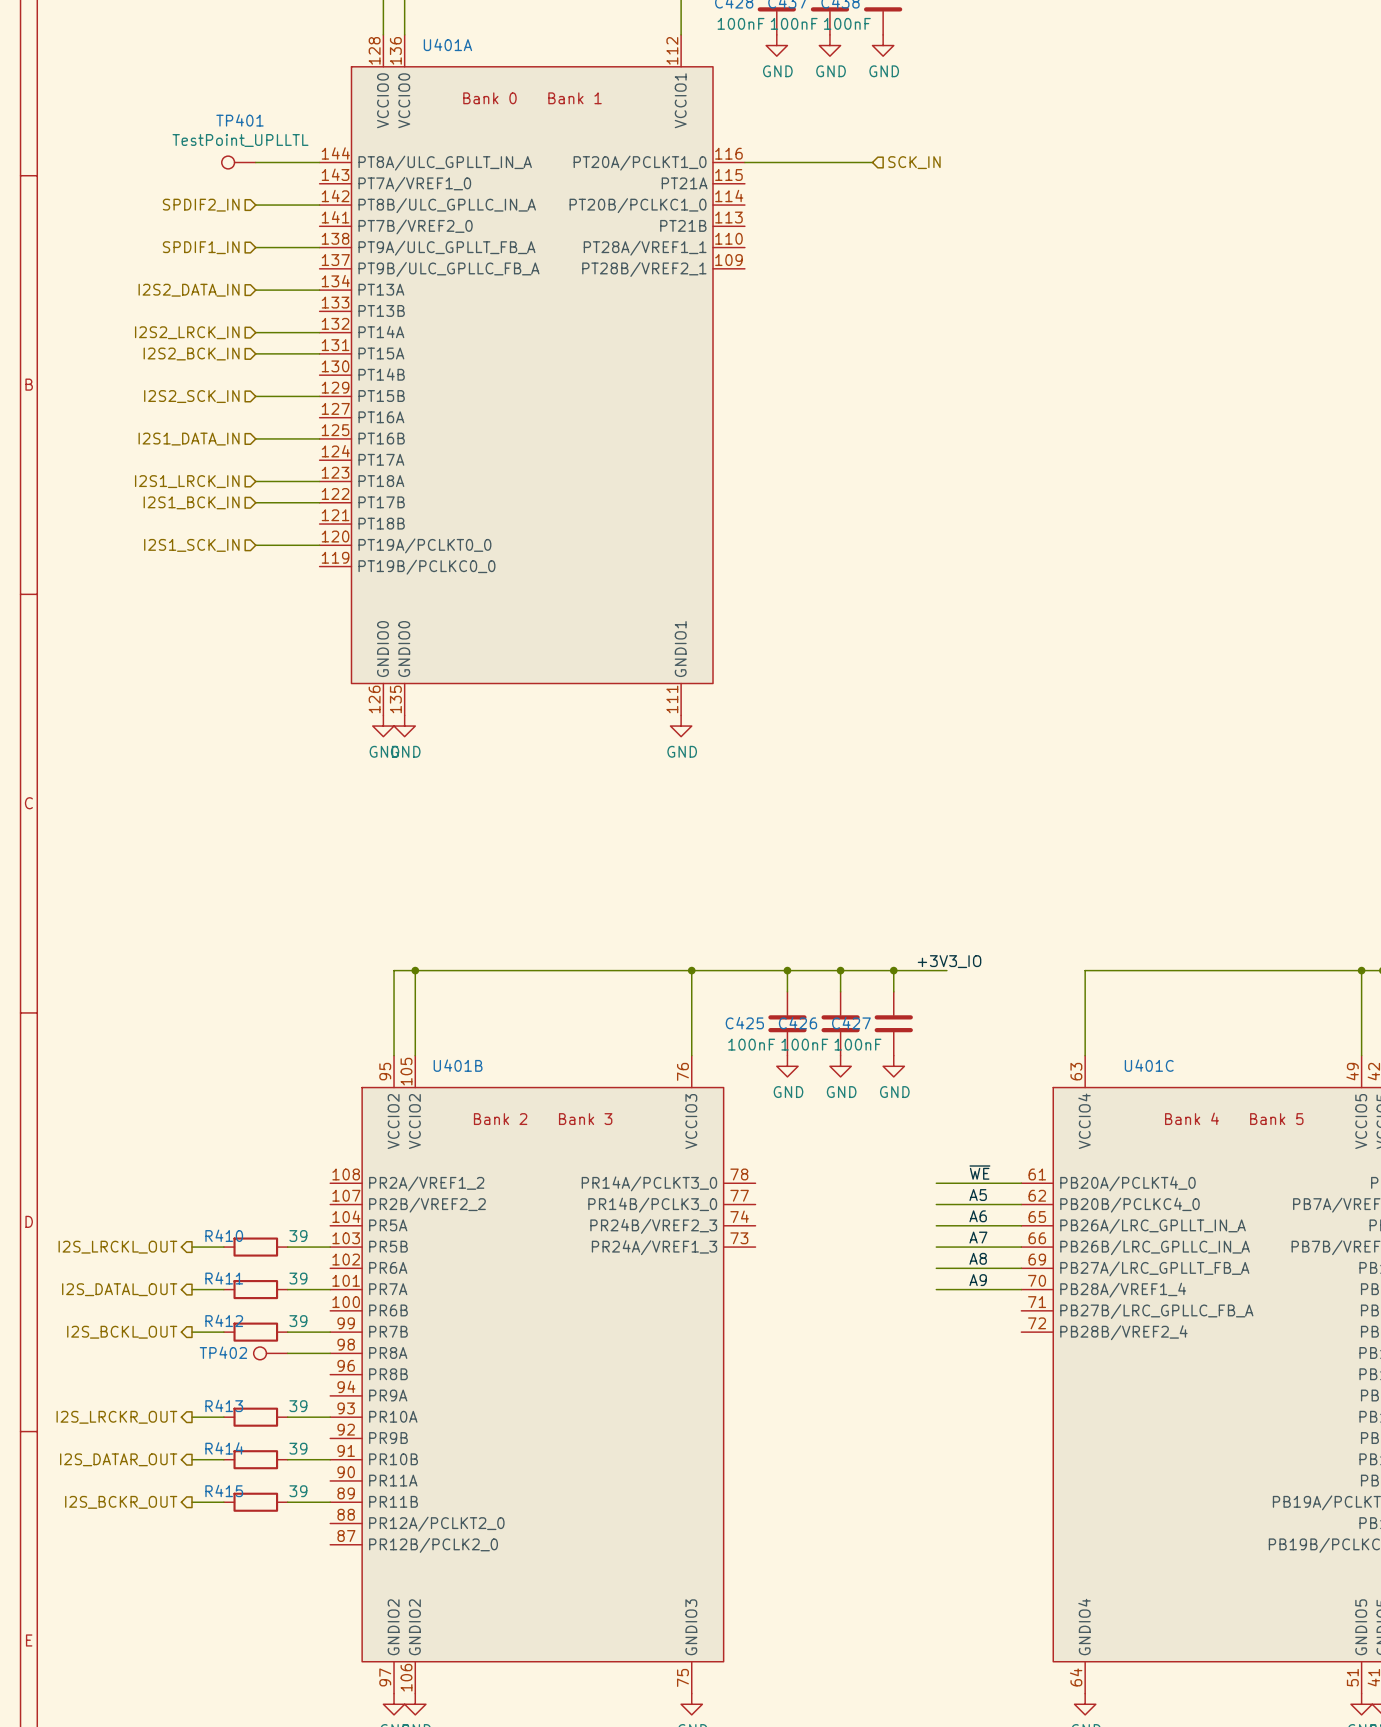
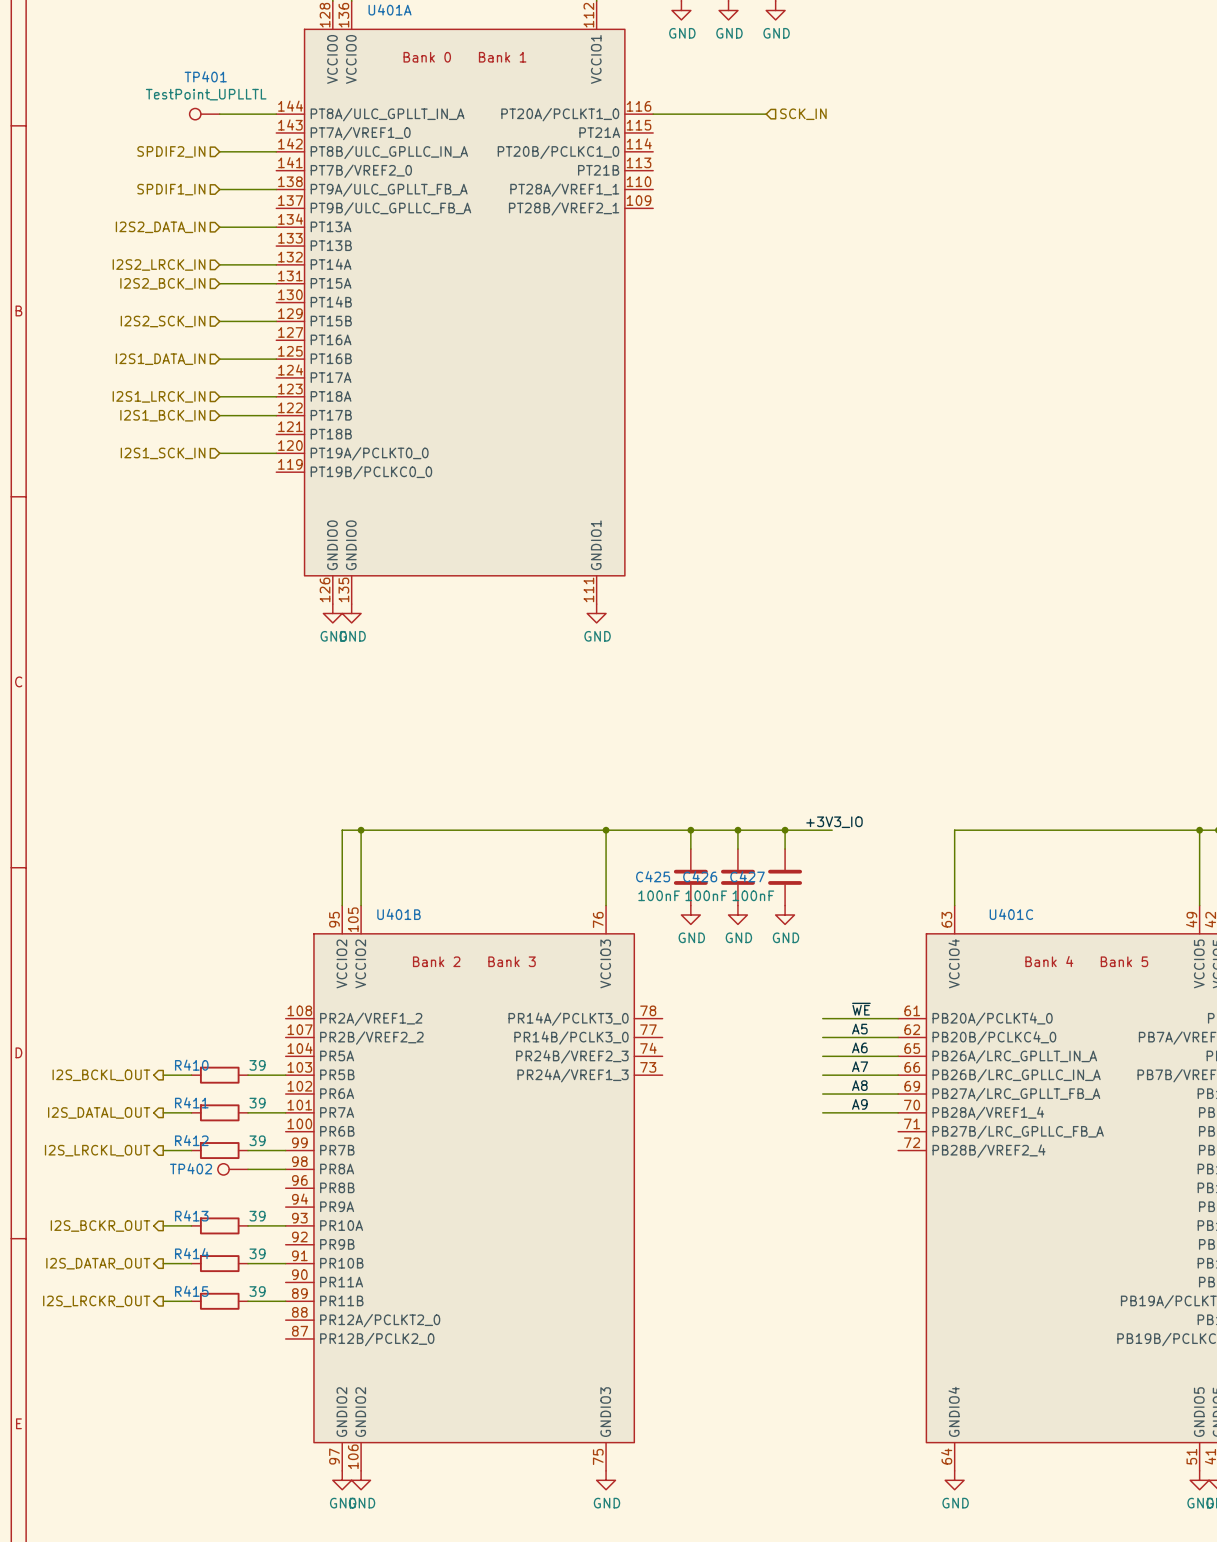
hierarchical label: I2S_LRCKL_OUT (117, 1247) -> I2S_BCKL_OUT (101, 1075)
hierarchical label: I2S_BCKL_OUT (122, 1332) -> I2S_LRCKL_OUT (97, 1150)
hierarchical label: I2S_LRCKR_OUT (116, 1417) -> I2S_BCKR_OUT (100, 1226)
hierarchical label: I2S_BCKR_OUT (121, 1502) -> I2S_LRCKR_OUT (96, 1301)

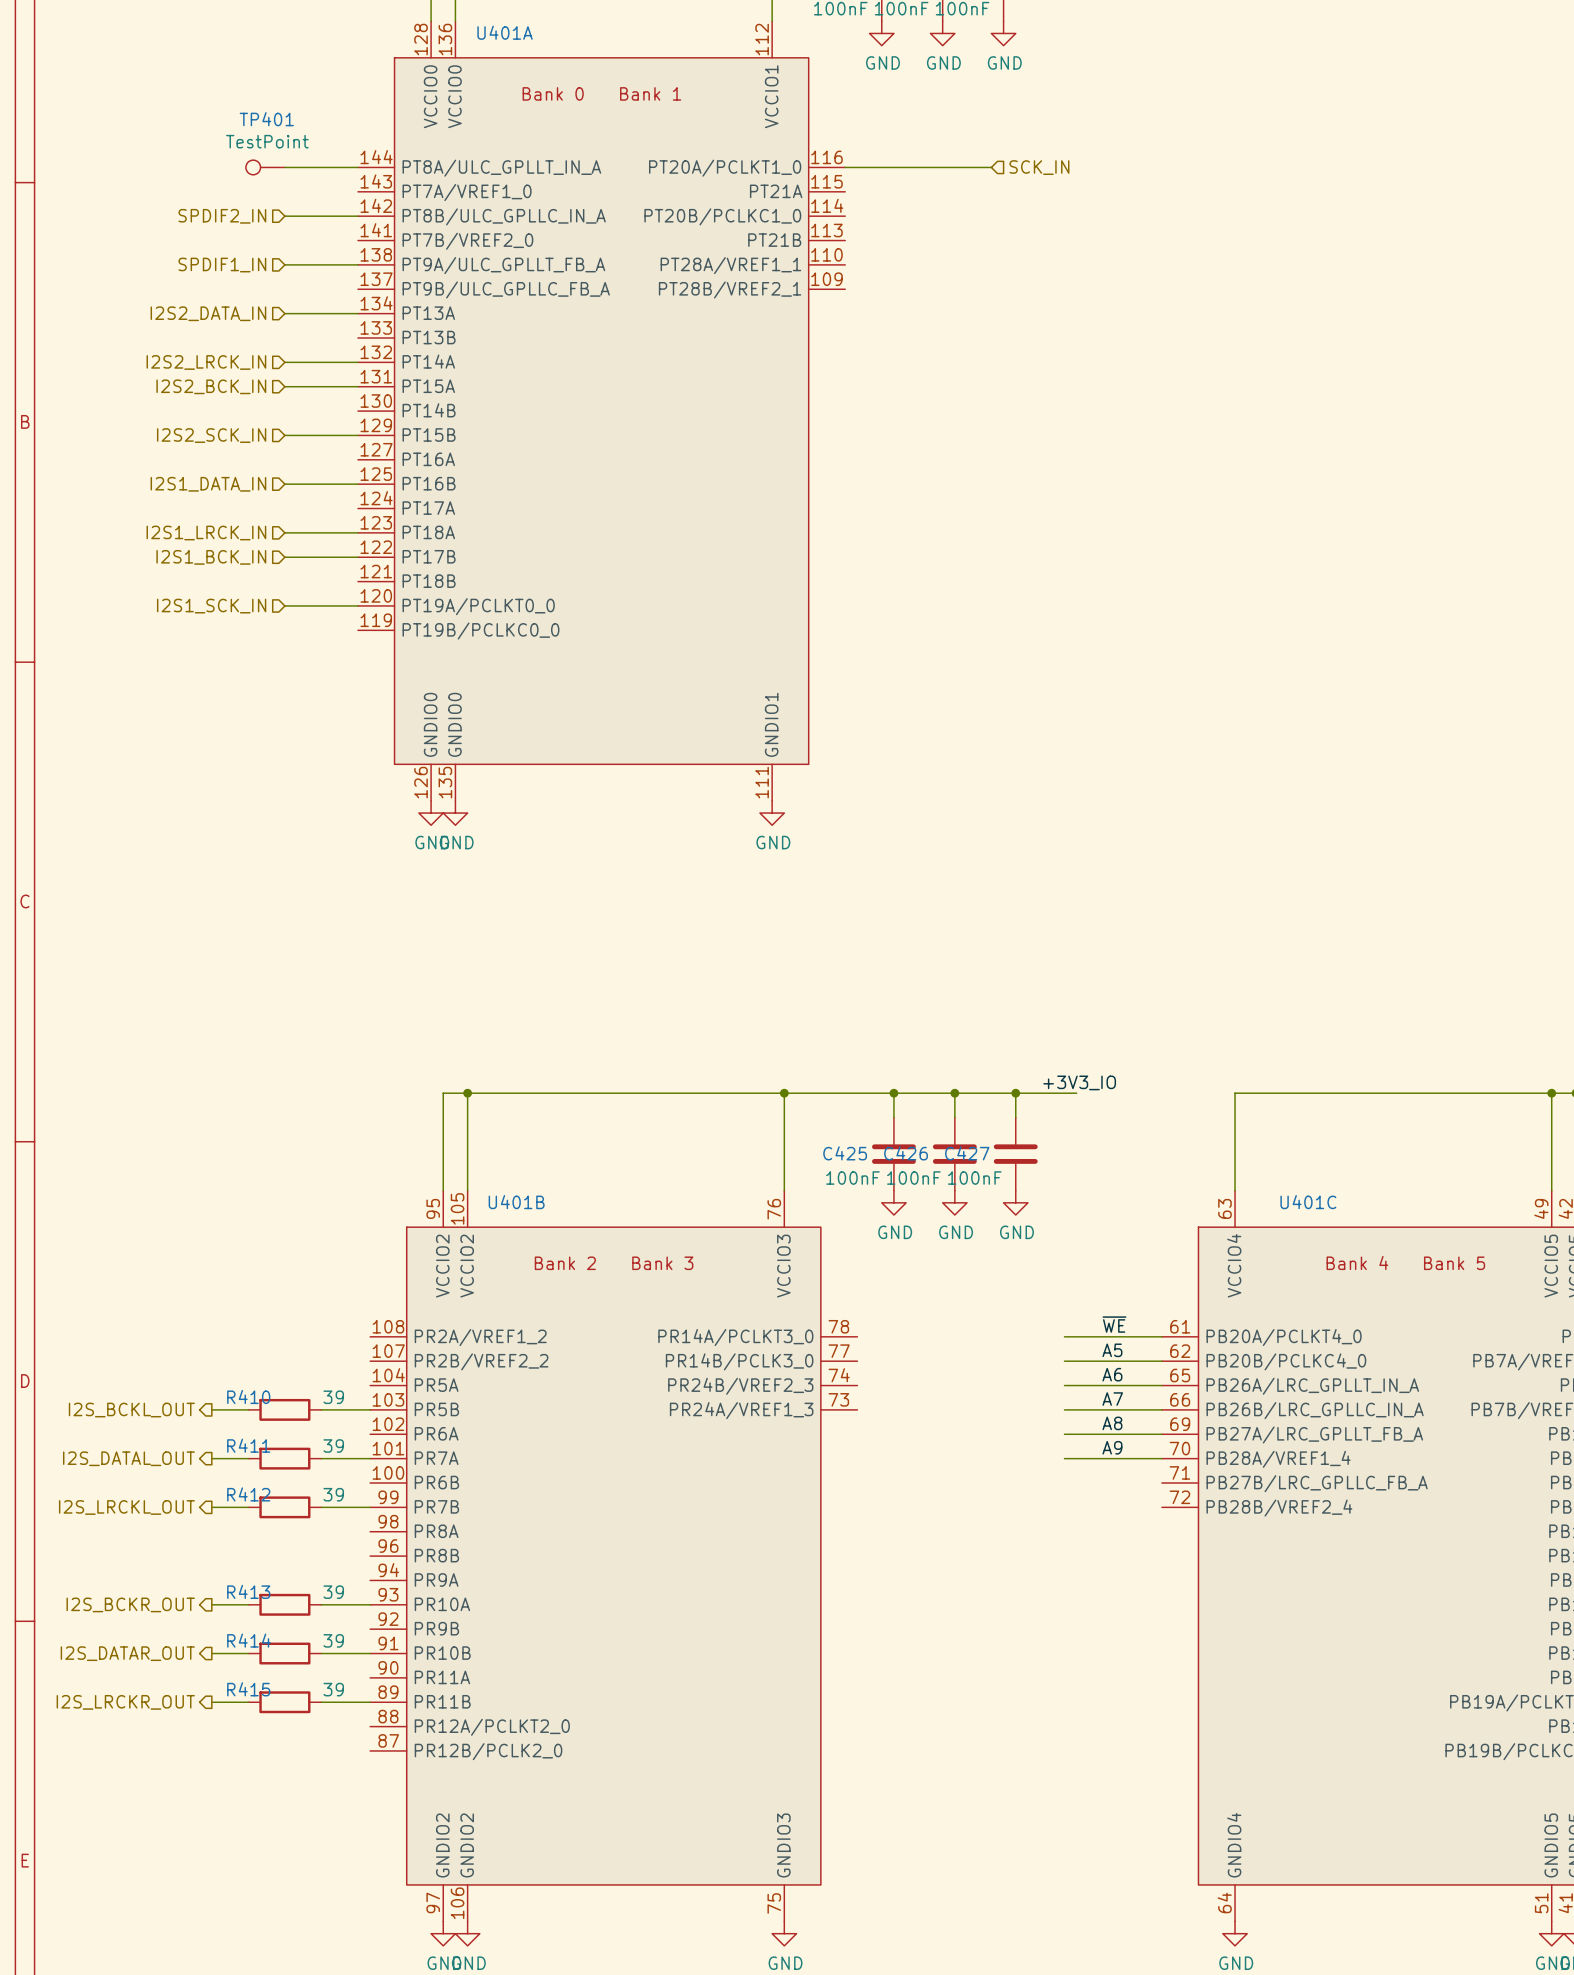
TP401 value: TestPoint_UPLLTL (206, 94) -> TestPoint (267, 141)
TP402: (232, 1169) -> none
wire: (248, 1169) (285, 1169) -> none

